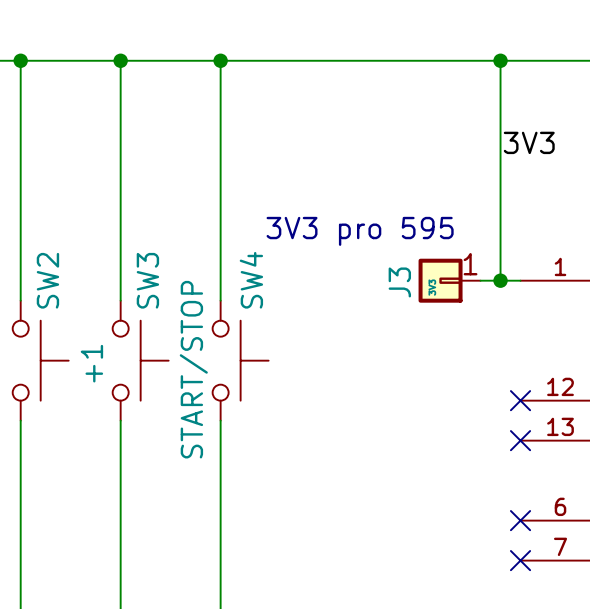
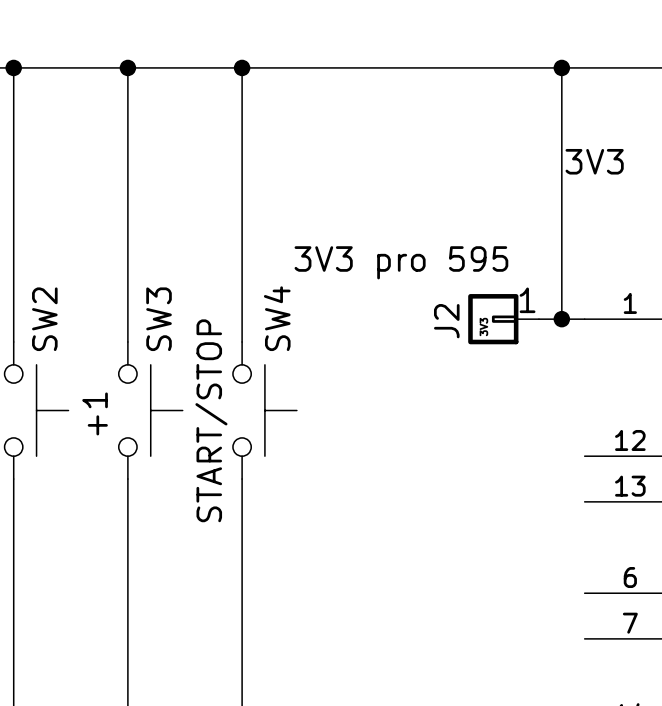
J3 name: J3 (399, 282) -> J2 (446, 321)
no-connect mark: (520, 400) -> none
no-connect mark: (520, 440) -> none
no-connect mark: (520, 520) -> none
no-connect mark: (520, 560) -> none

